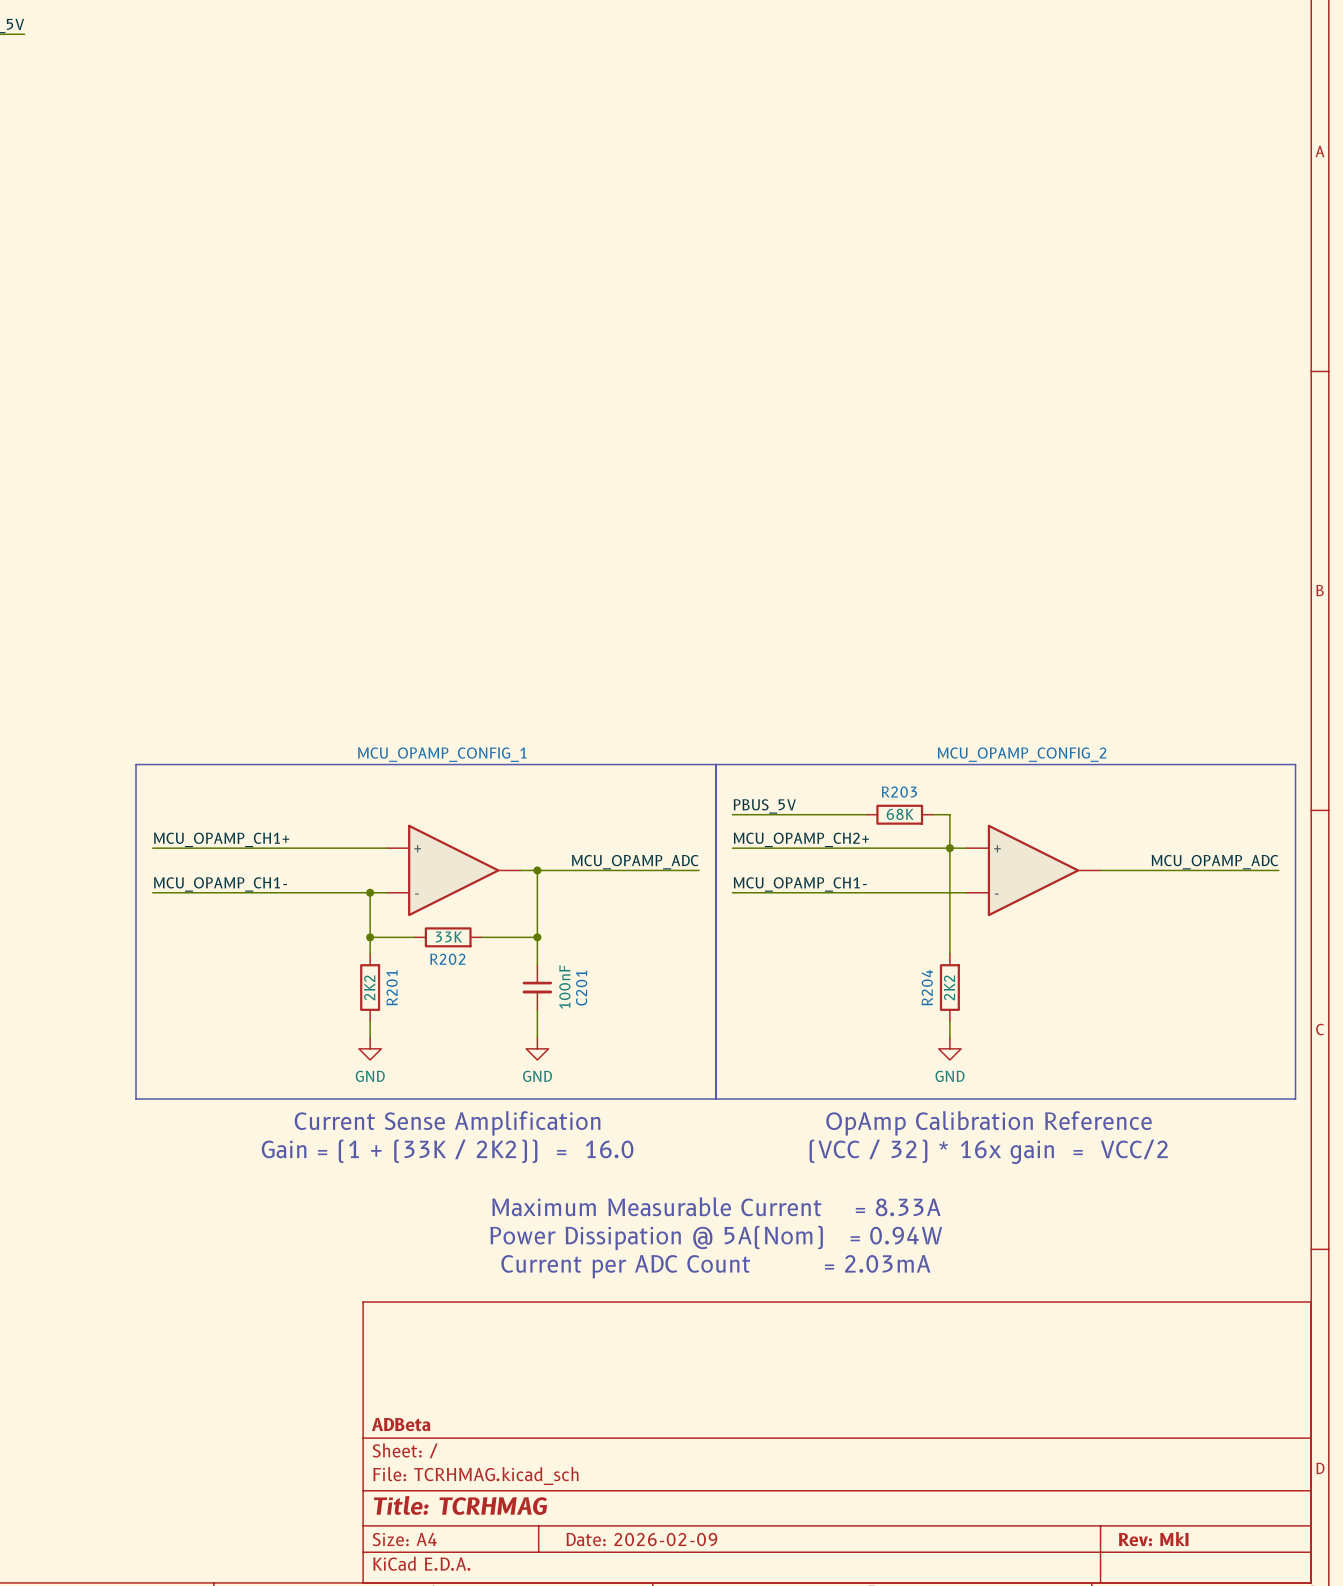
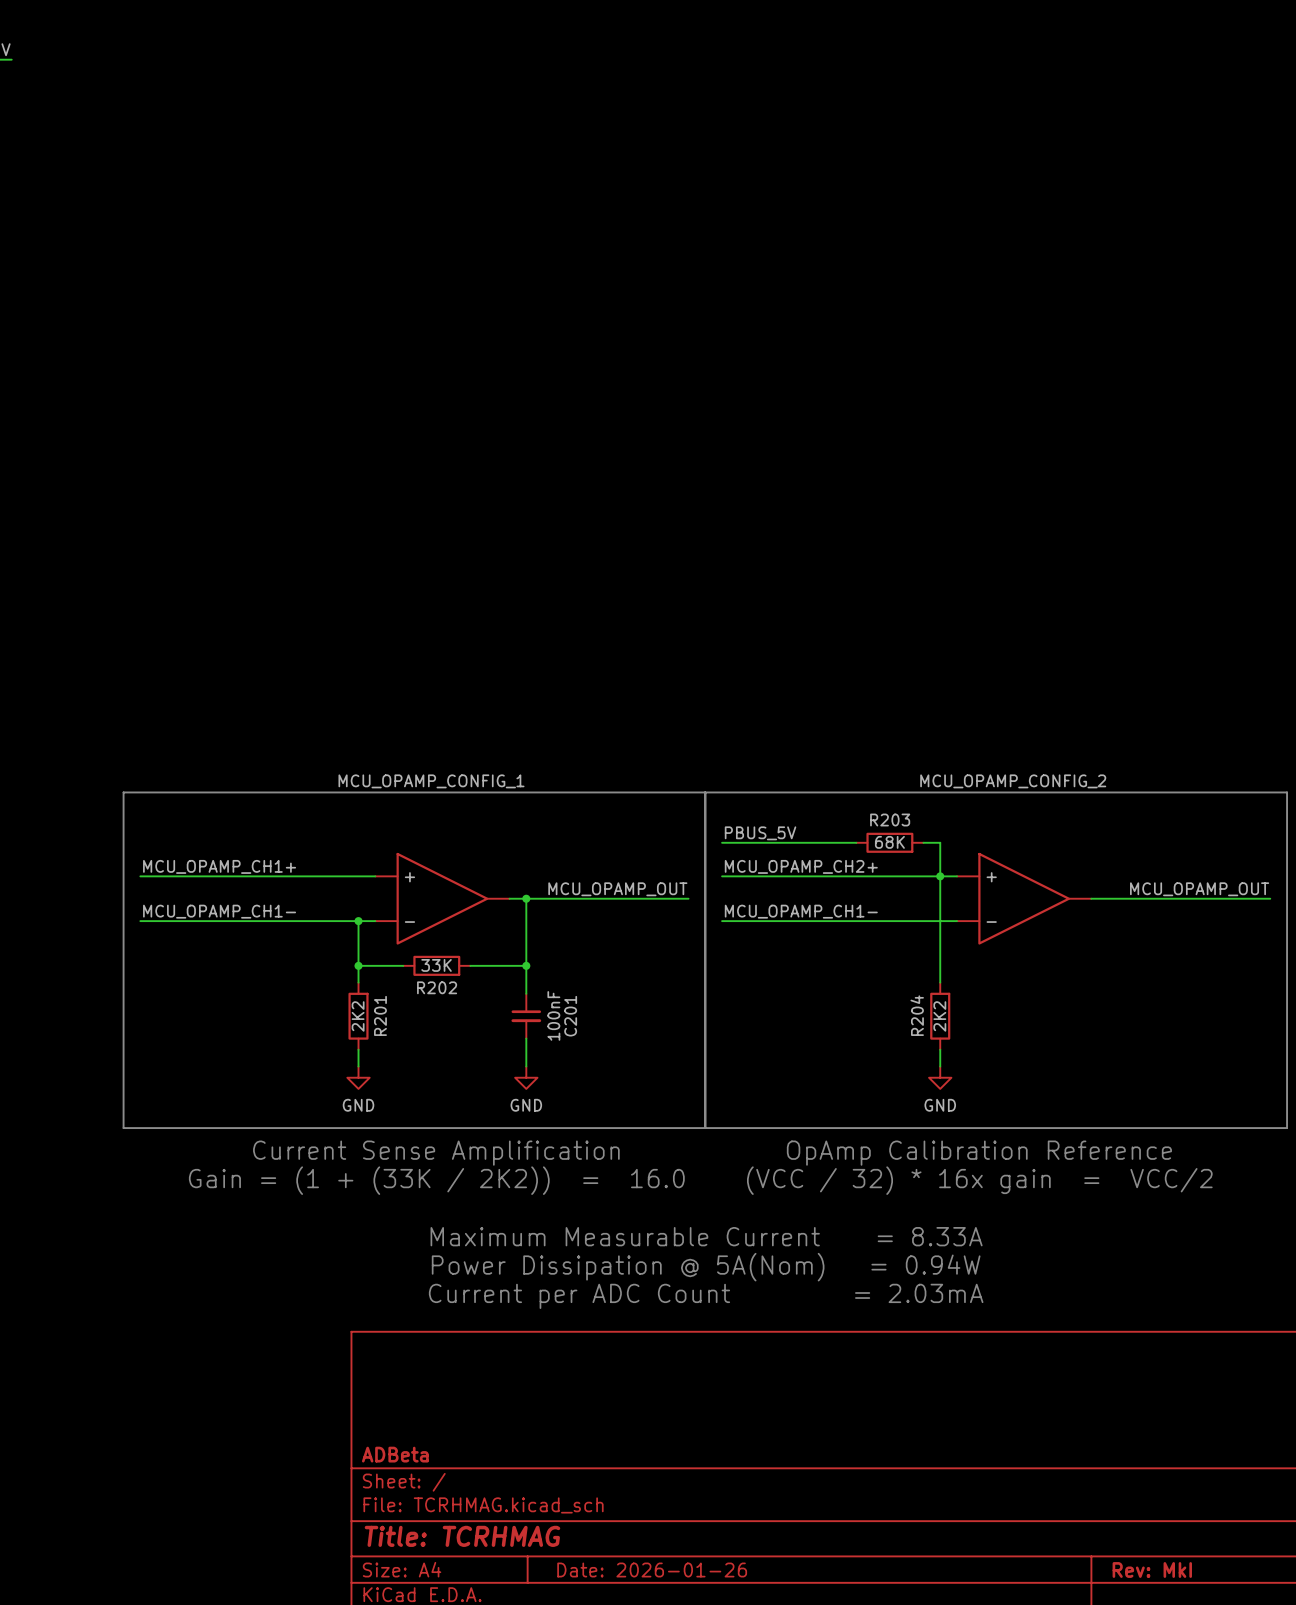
label: MCU_OPAMP_ADC (635, 862) -> MCU_OPAMP_OUT (617, 889)
label: MCU_OPAMP_ADC (1214, 862) -> MCU_OPAMP_OUT (1199, 889)
title block: Date: 2026-02-09 (641, 1539) -> Date: 2026-01-26 (652, 1570)

